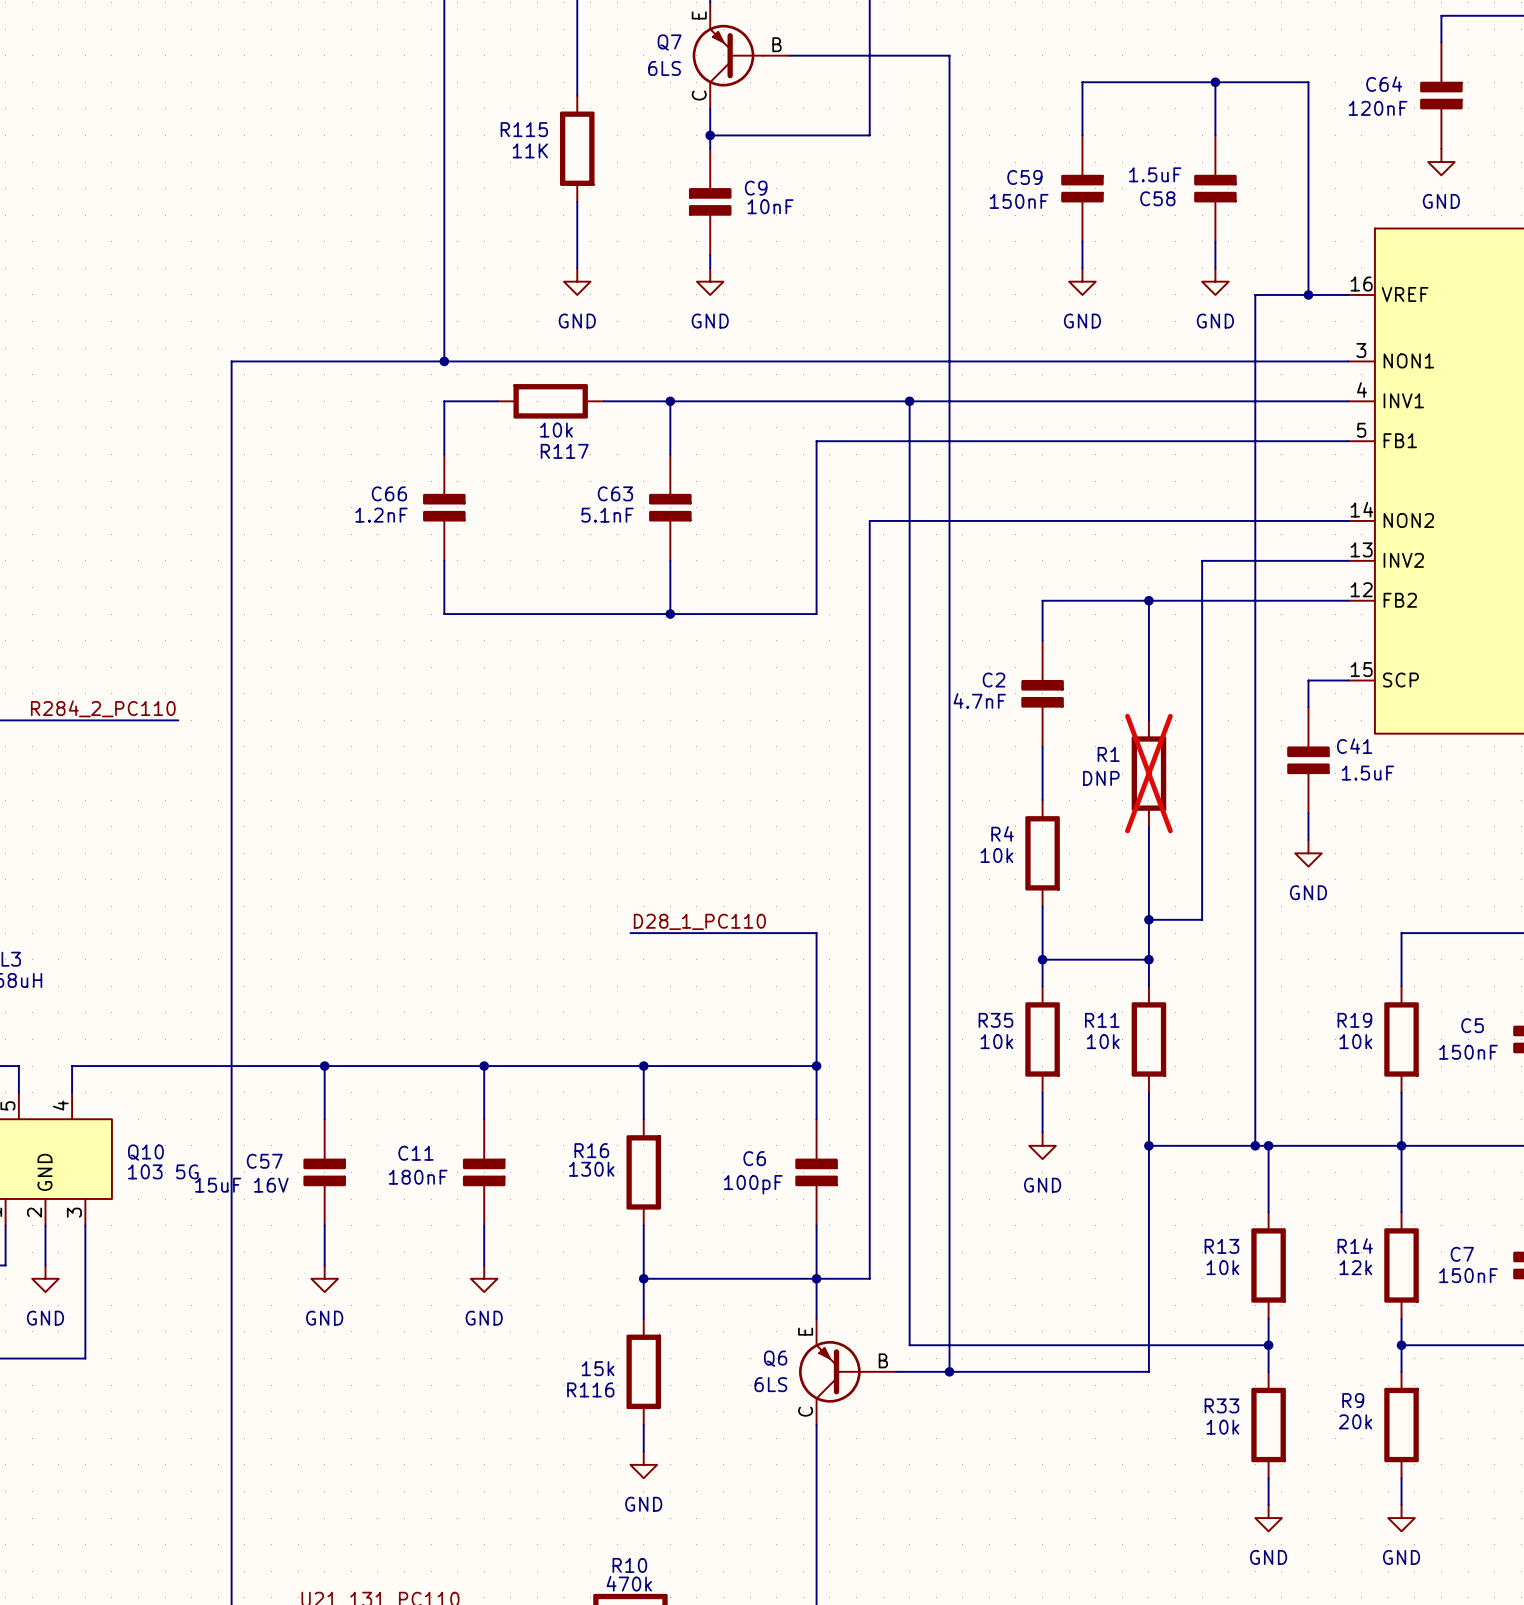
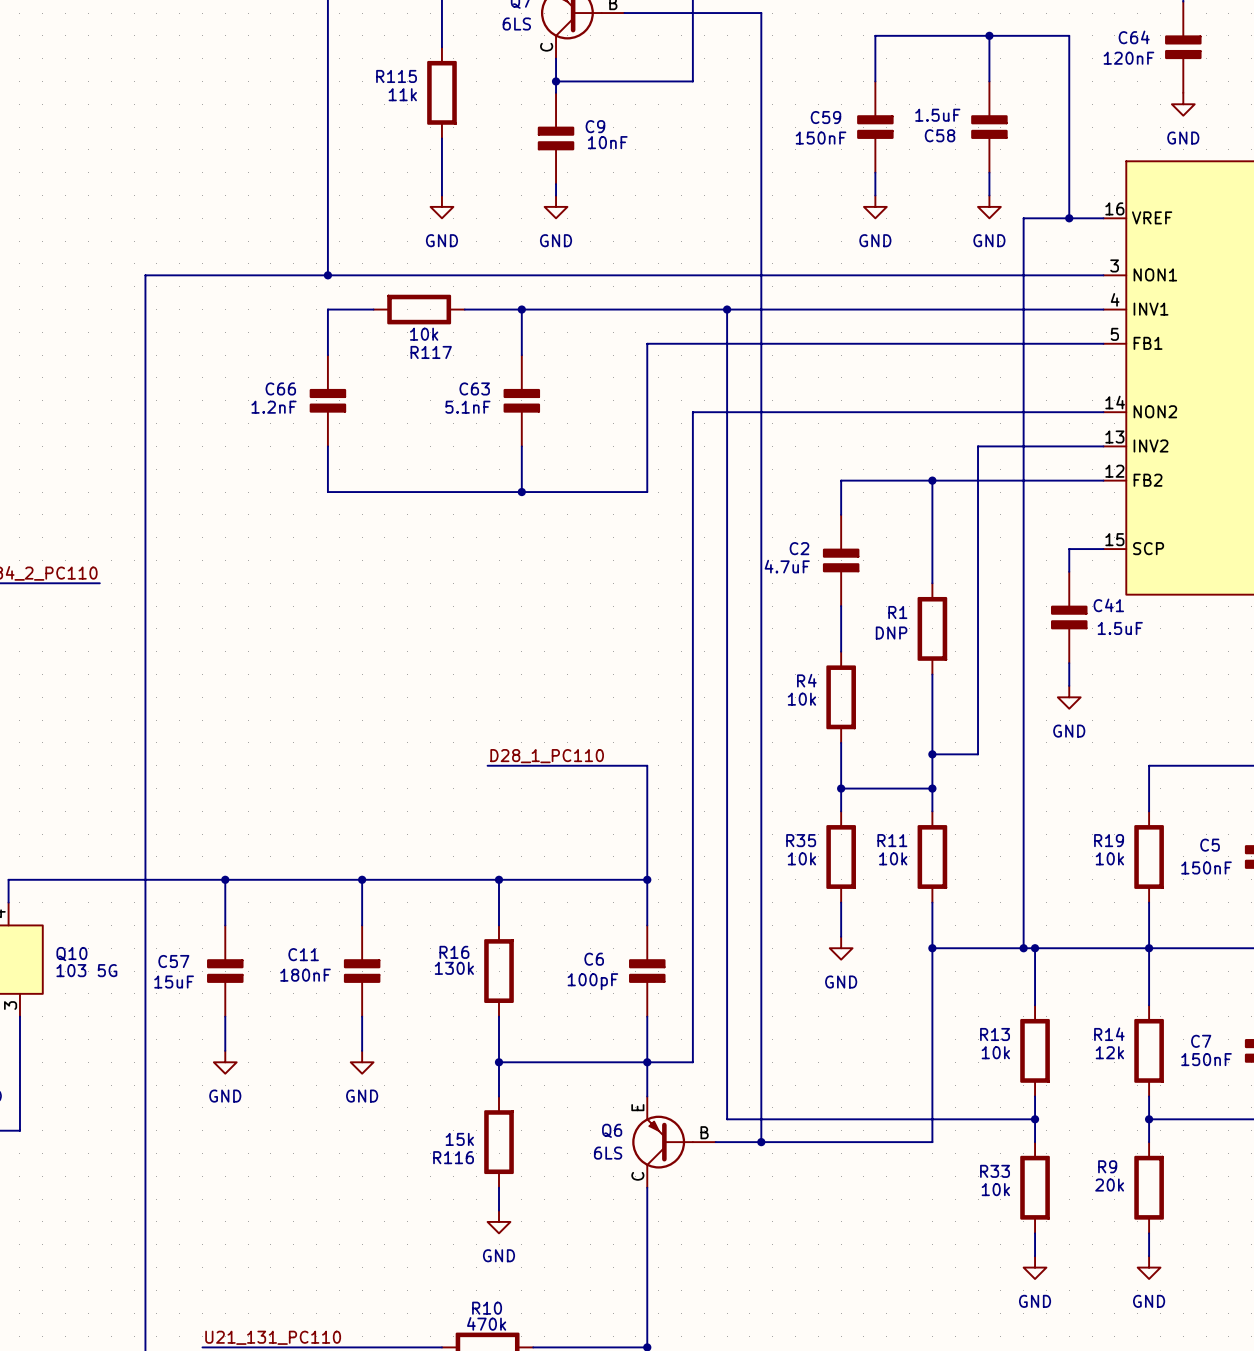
R115 value: 11K (530, 150) -> 11k (402, 94)
C2 value: 4.7nF (979, 700) -> 4.7uF (787, 566)
R1 do-not-place cross: (1148, 773) -> none
C57 value: 15uF 16V (241, 1185) -> 15uF (174, 982)

